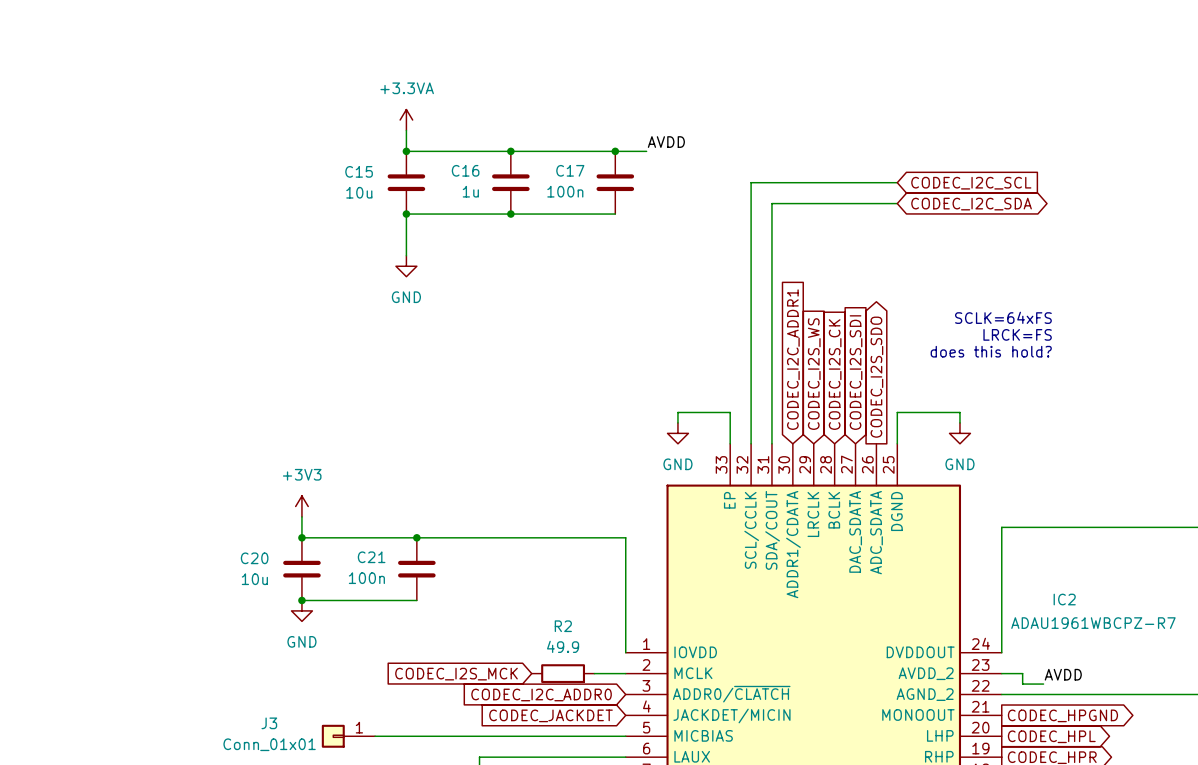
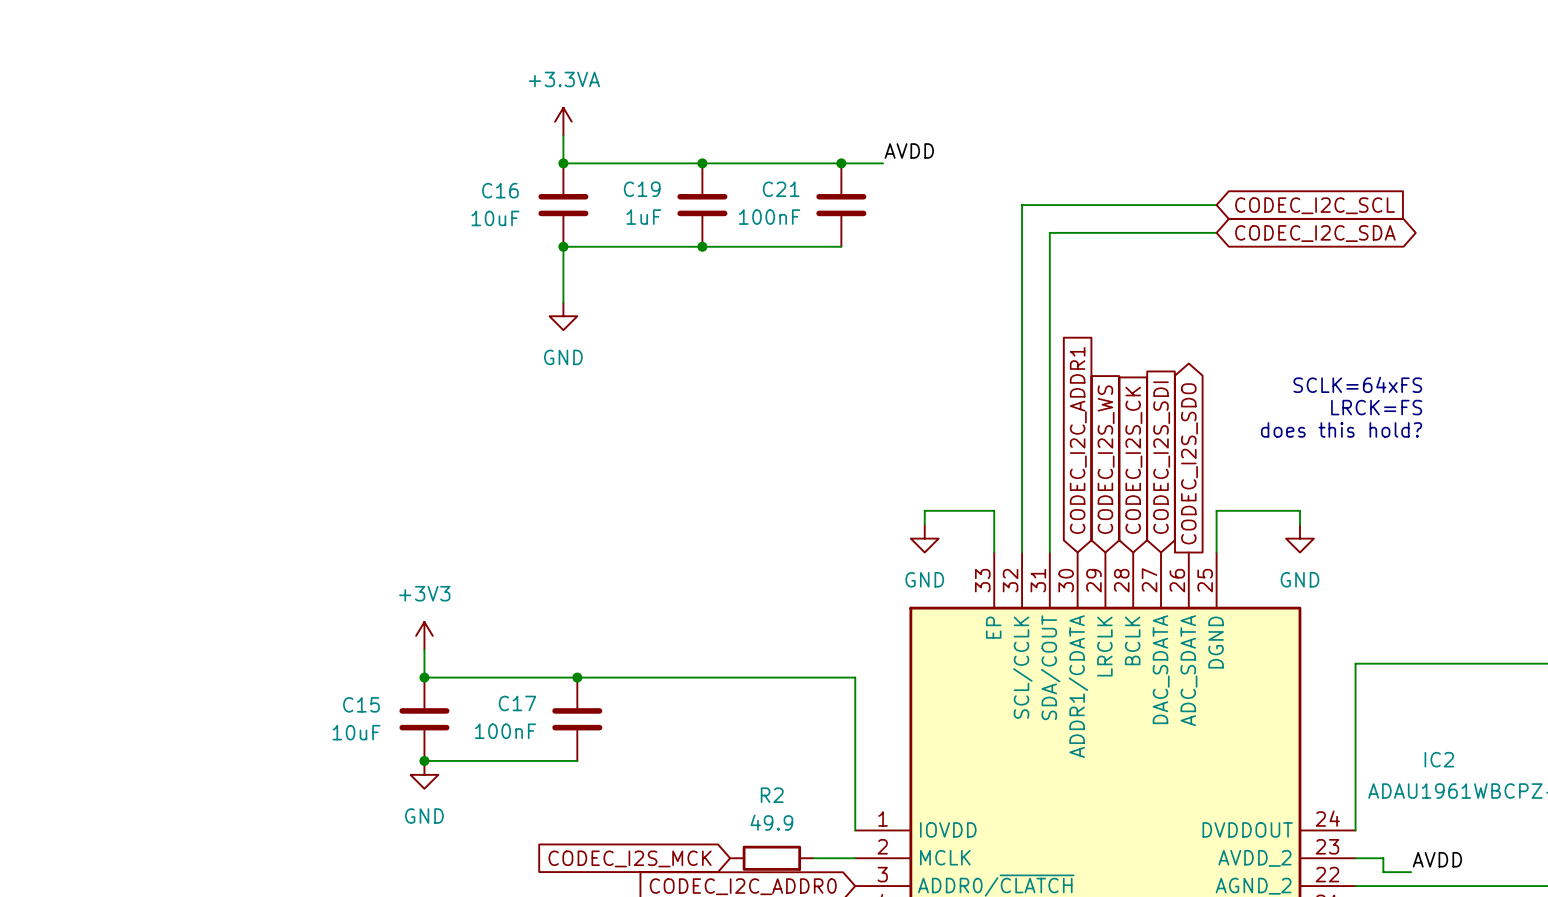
C16 name: C16 (465, 170) -> C19 (642, 189)
C17 name: C17 (570, 170) -> C21 (781, 189)
C15 name: C15 (359, 171) -> C16 (500, 190)
C16 value: 1u (470, 191) -> 1uF (643, 217)
C17 value: 100n (565, 191) -> 100nF (769, 217)
C15 value: 10u (359, 192) -> 10uF (495, 218)
C21 name: C21 (371, 557) -> C17 (517, 703)
C20 name: C20 (254, 558) -> C15 (361, 704)
C21 value: 100n (366, 578) -> 100nF (505, 731)
C20 value: 10u (254, 579) -> 10uF (356, 732)

